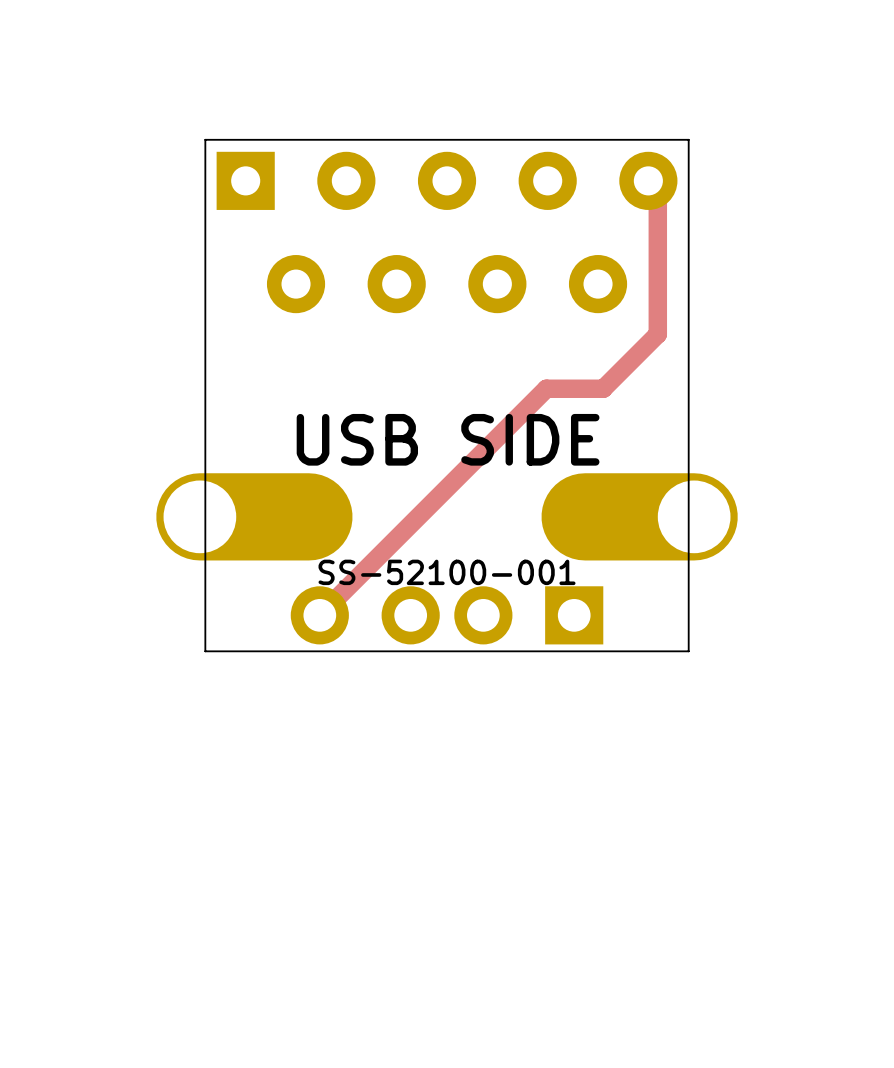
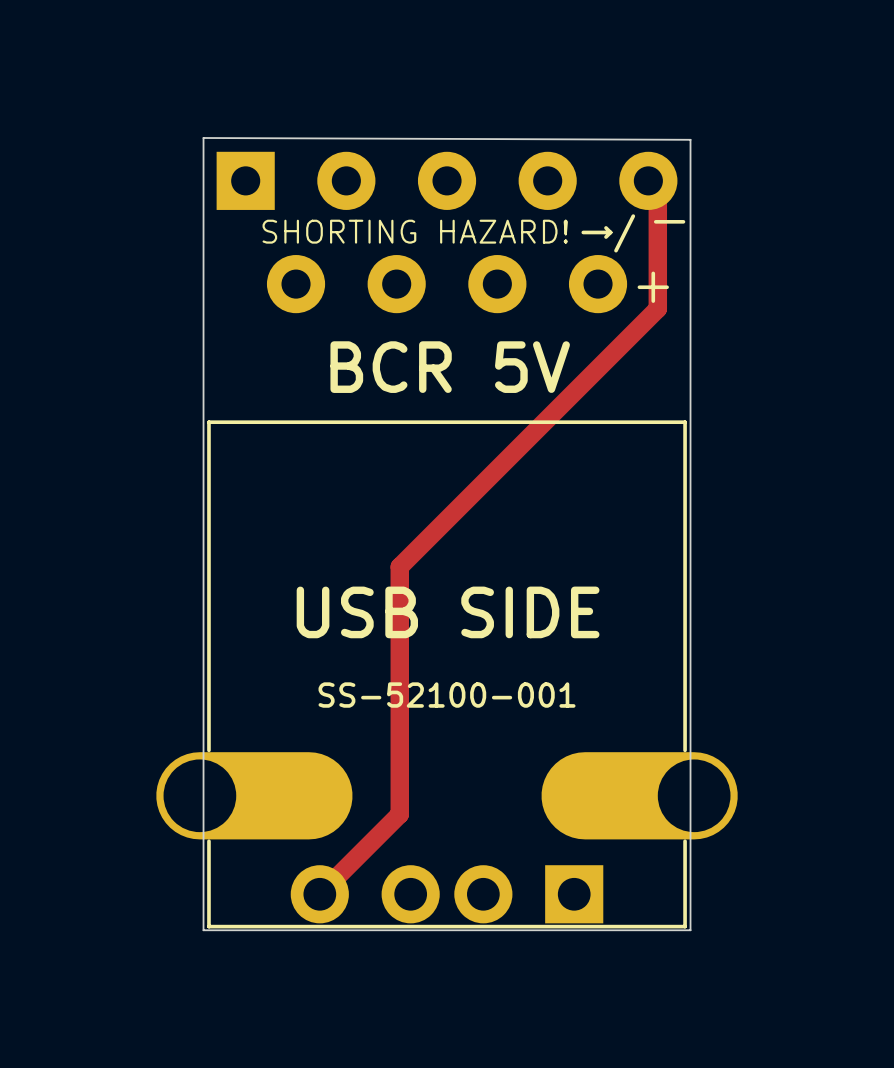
board edge: (205, 139) (205, 651) (688, 651) (688, 139) (205, 139) -> (203, 137) (203, 930) (690, 930) (690, 139) (203, 137)
line: none -> (633, 216) (616, 250)
text: none -> - (669, 221)
line: none -> (606, 227) (610, 232)
text: none -> SHORTING HAZARD! (415, 231)
line: none -> (583, 232) (610, 232)
line: none -> (610, 232) (606, 237)
text: none -> + (653, 287)
track: (657, 308) (657, 334) (603, 388) (546, 388) (319, 615) -> (657, 308) (399, 566) (399, 814) (319, 894)
text: none -> BCR 5V (450, 367)
text position: USB SIDE (448, 439) -> USB SIDE (448, 612)
part: (447, 558) -> none
text position: SS-52100-001 (447, 572) -> SS-52100-001 (447, 695)
part: none -> (447, 674)

